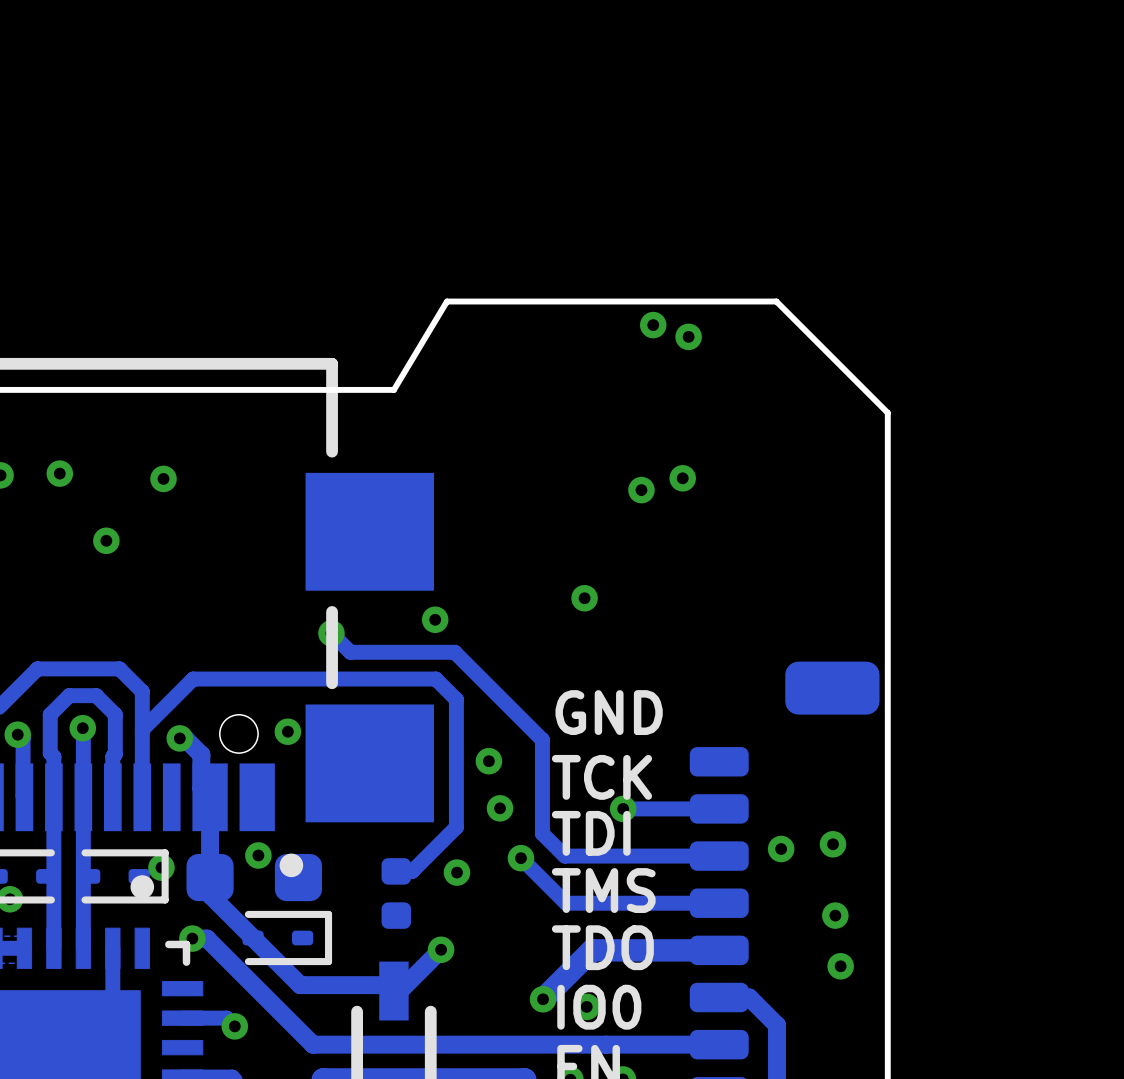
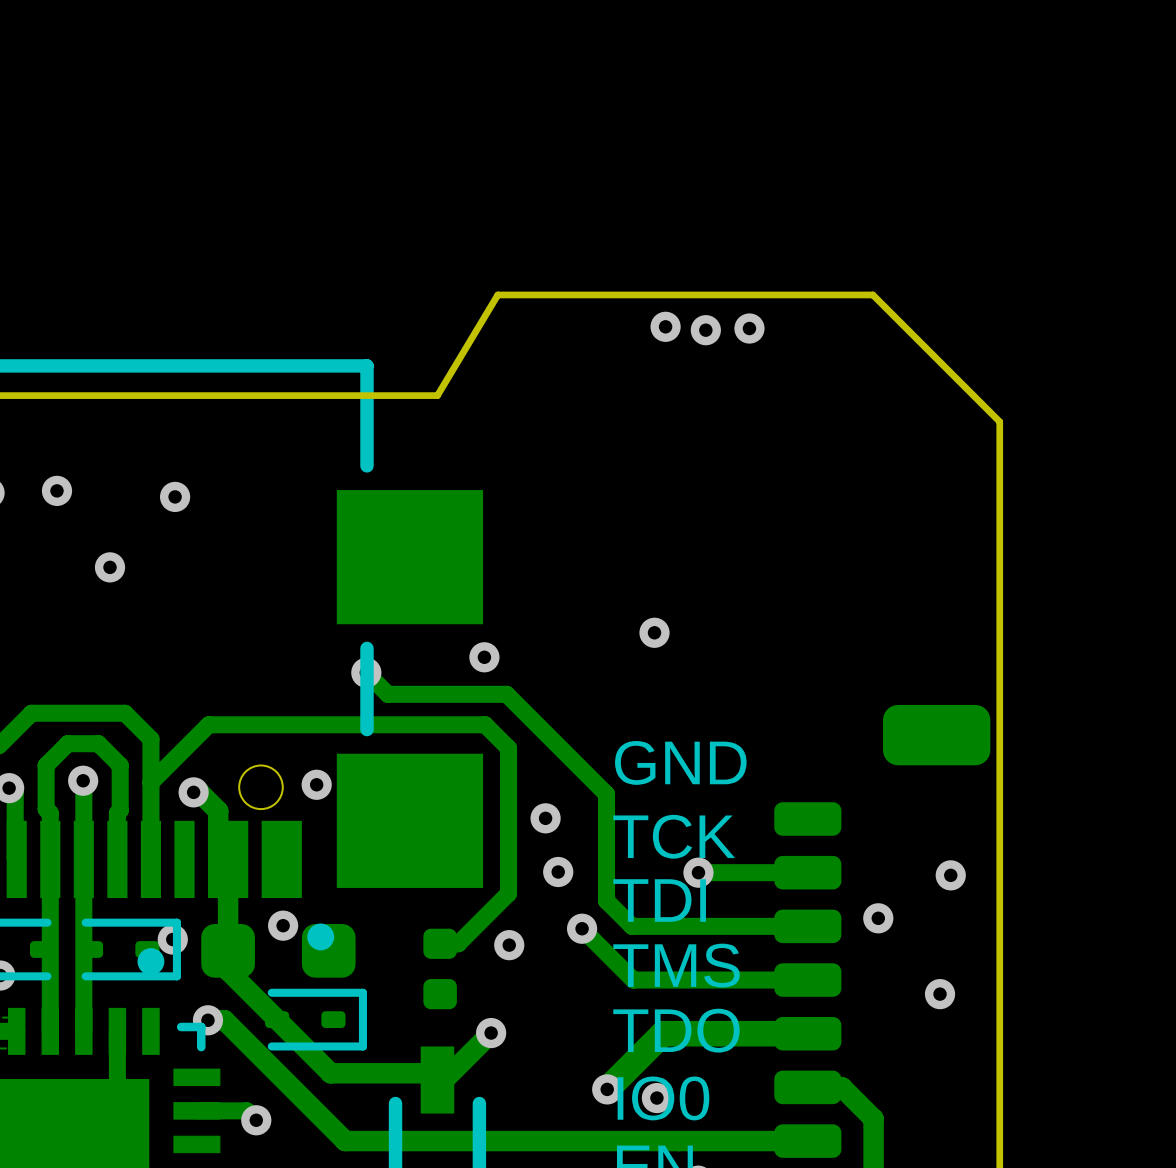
via: (653, 325) -> none
via: none -> (665, 326)
via: none -> (749, 328)
via: none -> (705, 330)
via: (688, 336) -> none
via: (682, 478) -> none
via: (641, 490) -> none
via position: (832, 844) -> (950, 875)
via: (840, 966) -> none

